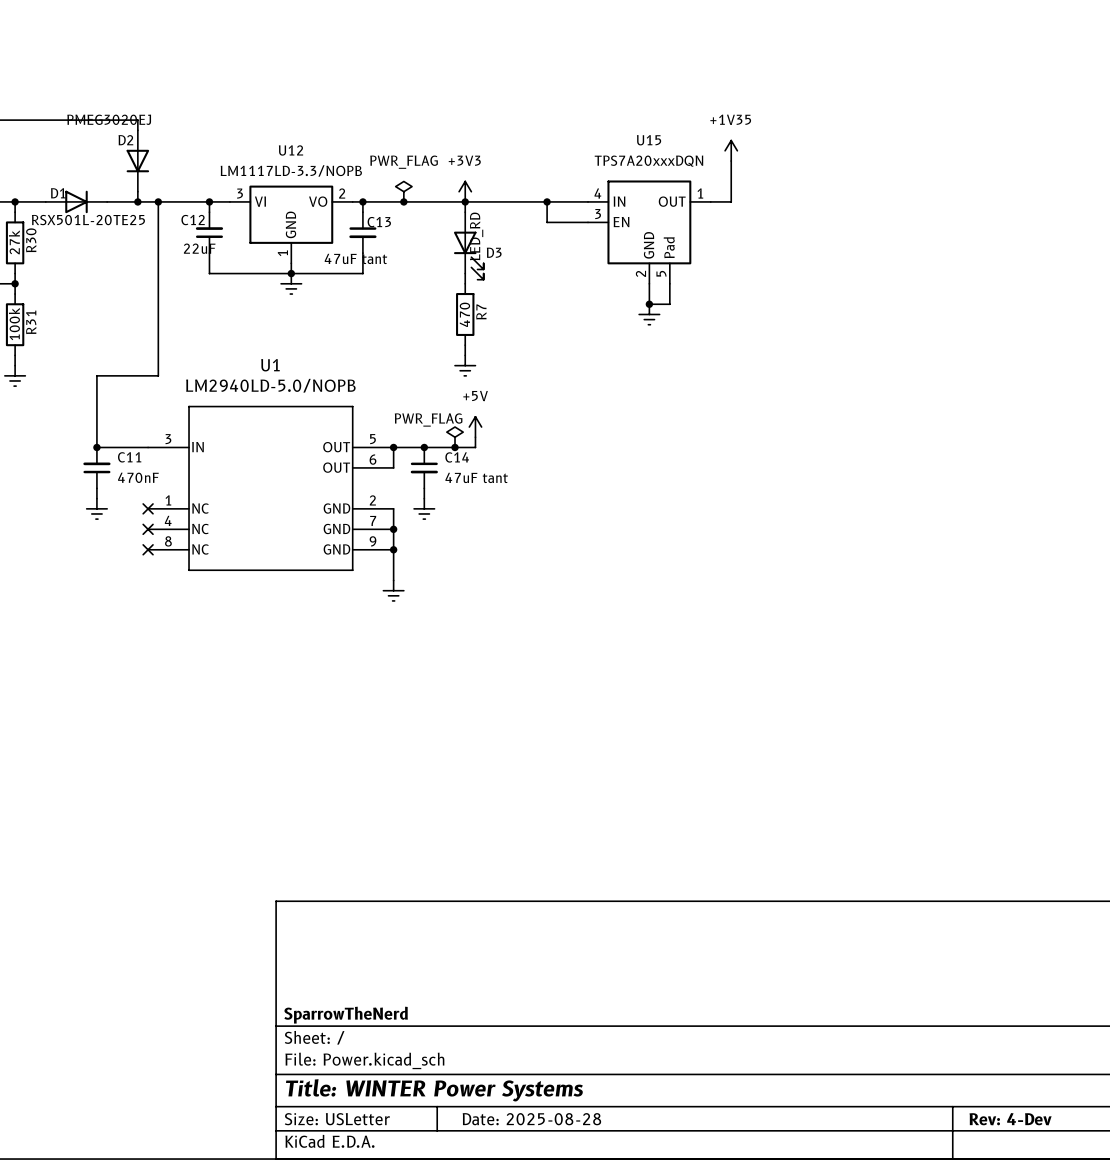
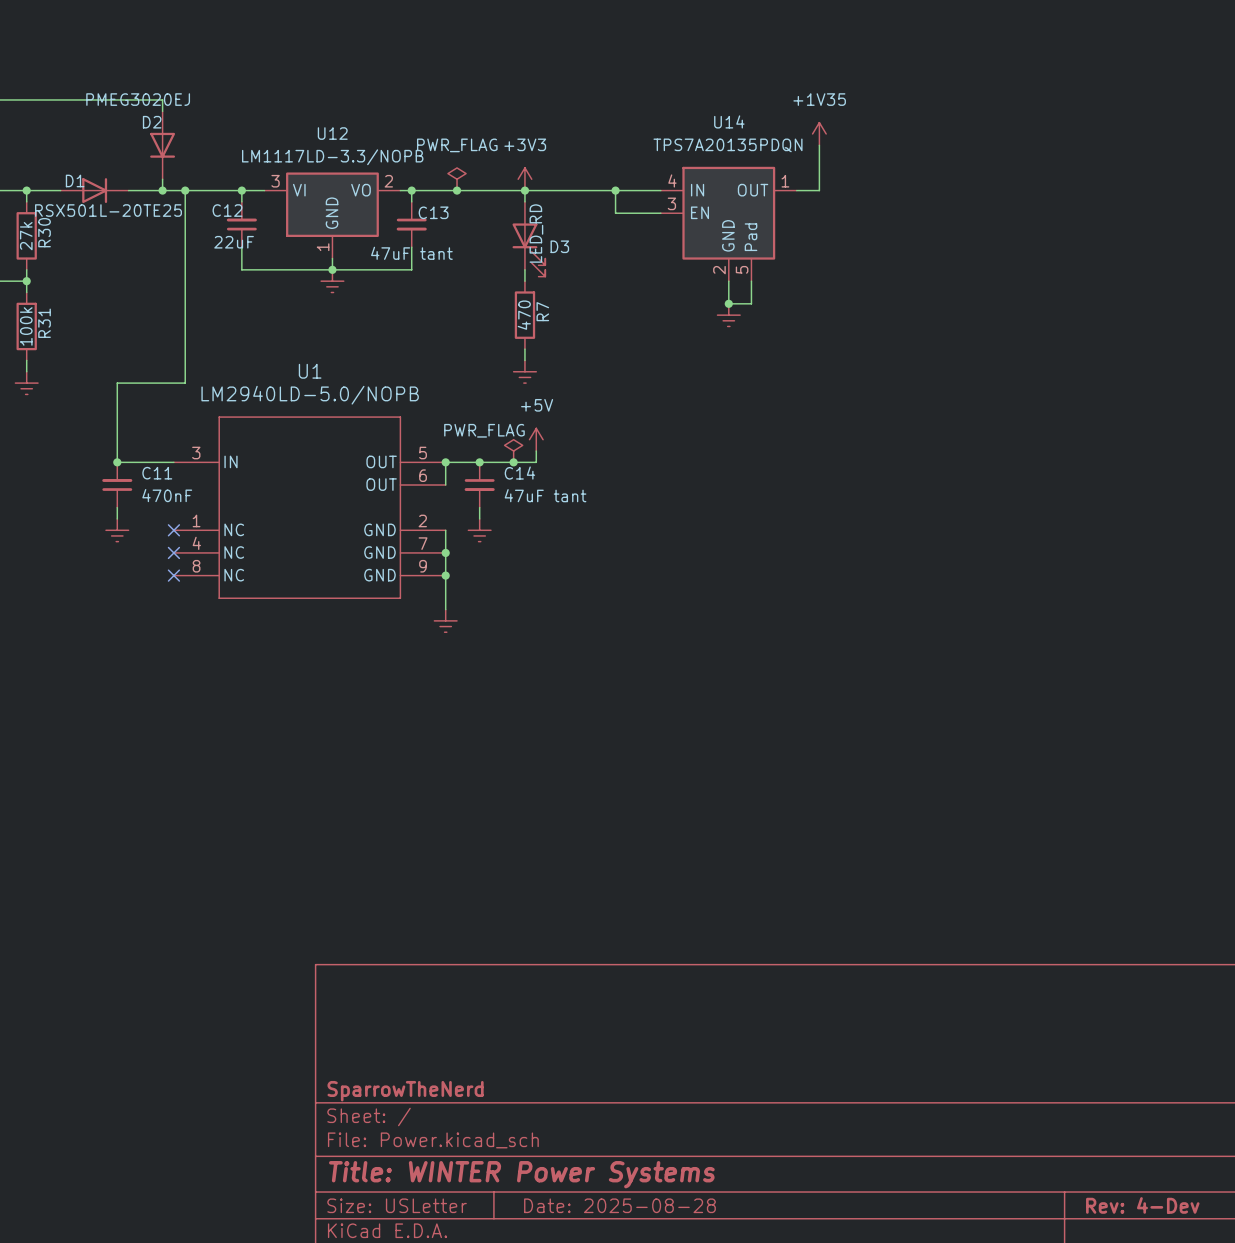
U15 name: U15 (649, 140) -> U14 (729, 121)
U15 value: TPS7A20xxxDQN (648, 161) -> TPS7A20135PDQN (727, 145)

